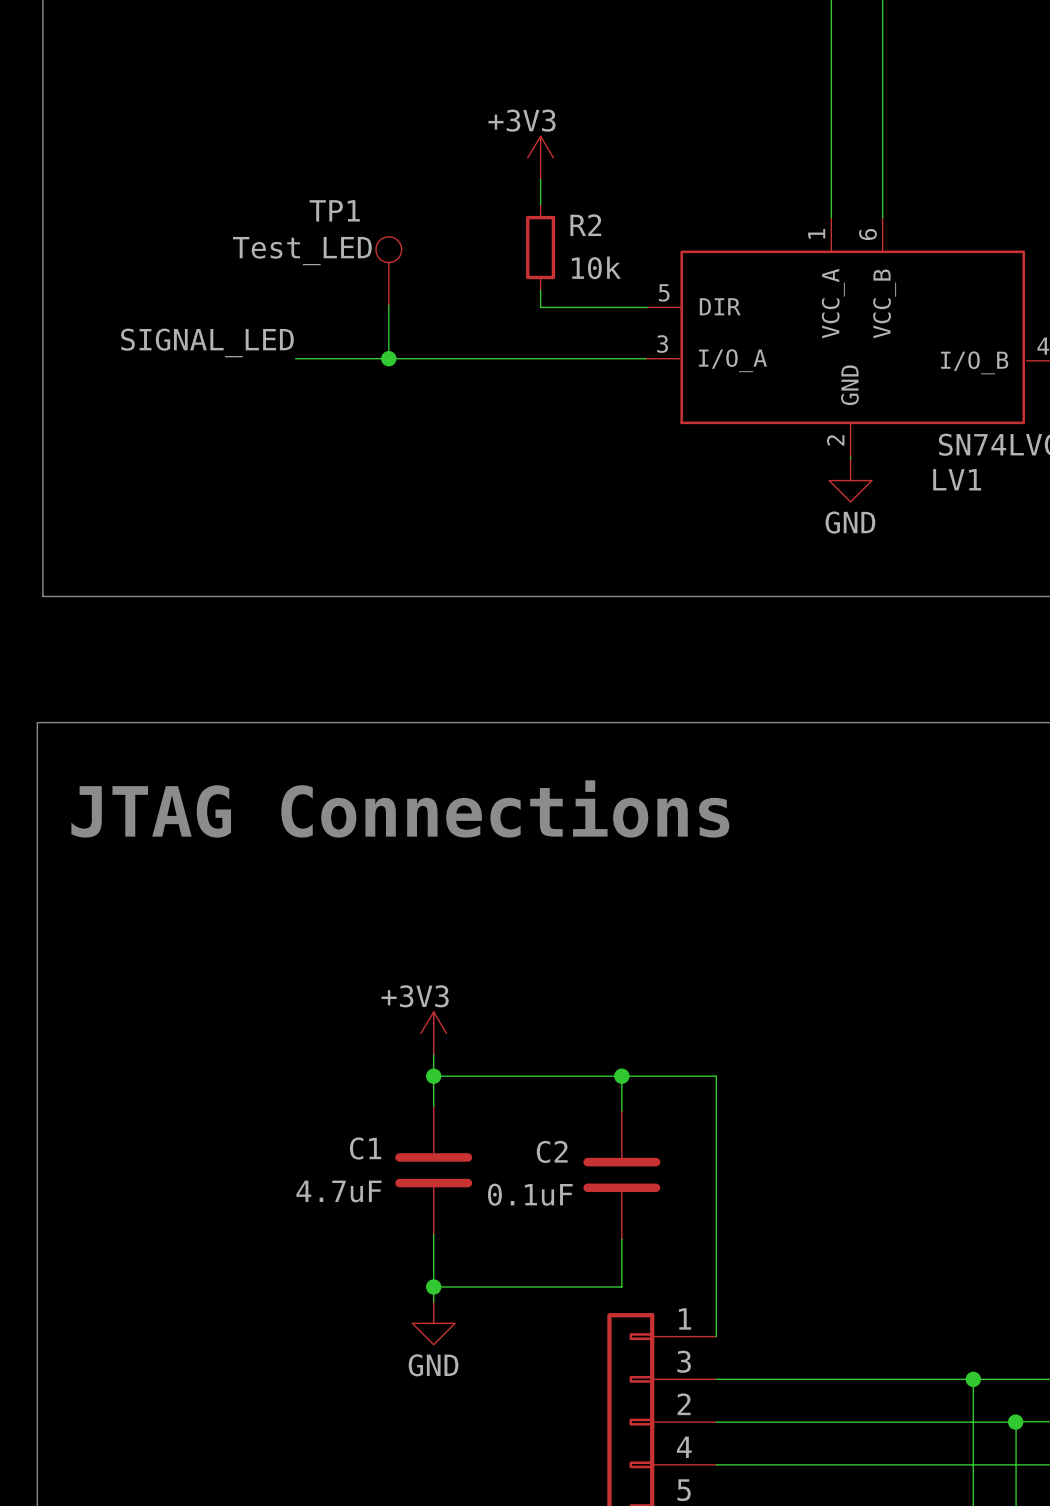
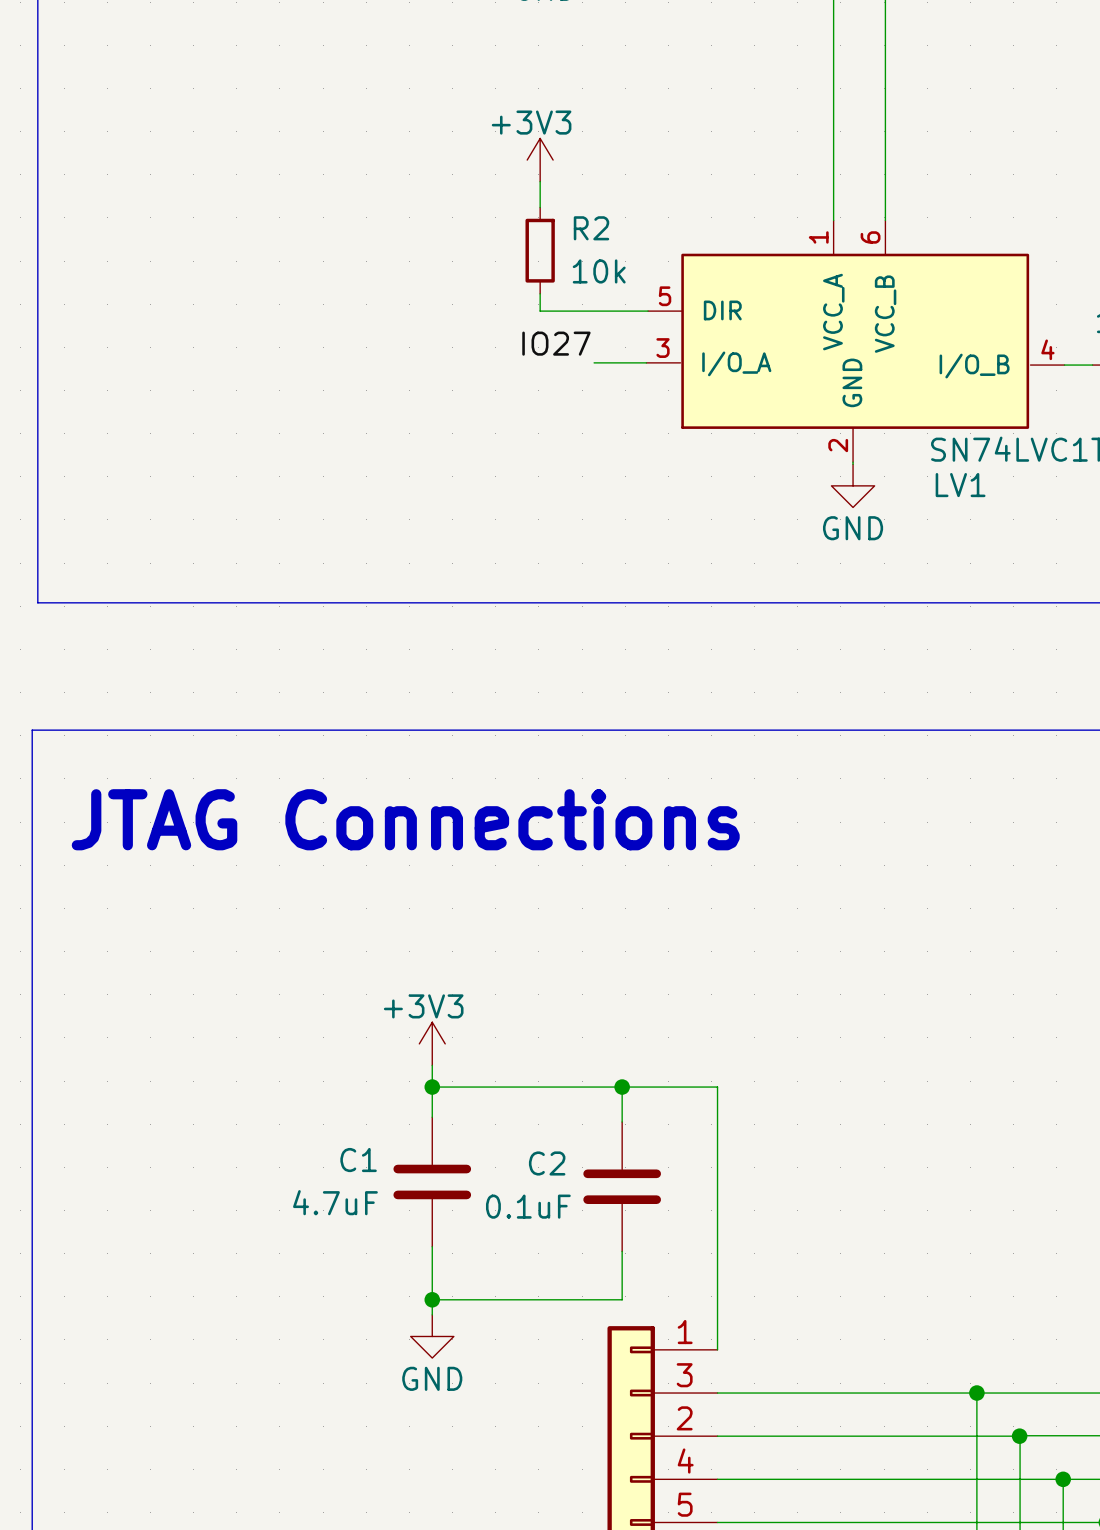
TP1: Test_LED (388, 271) -> none
wire: (388, 305) (388, 358) -> none
label: none -> IO27 (556, 343)
label: SIGNAL_LED (207, 342) -> none
wire: (295, 358) (594, 358) -> none
junction: (388, 358) -> none

